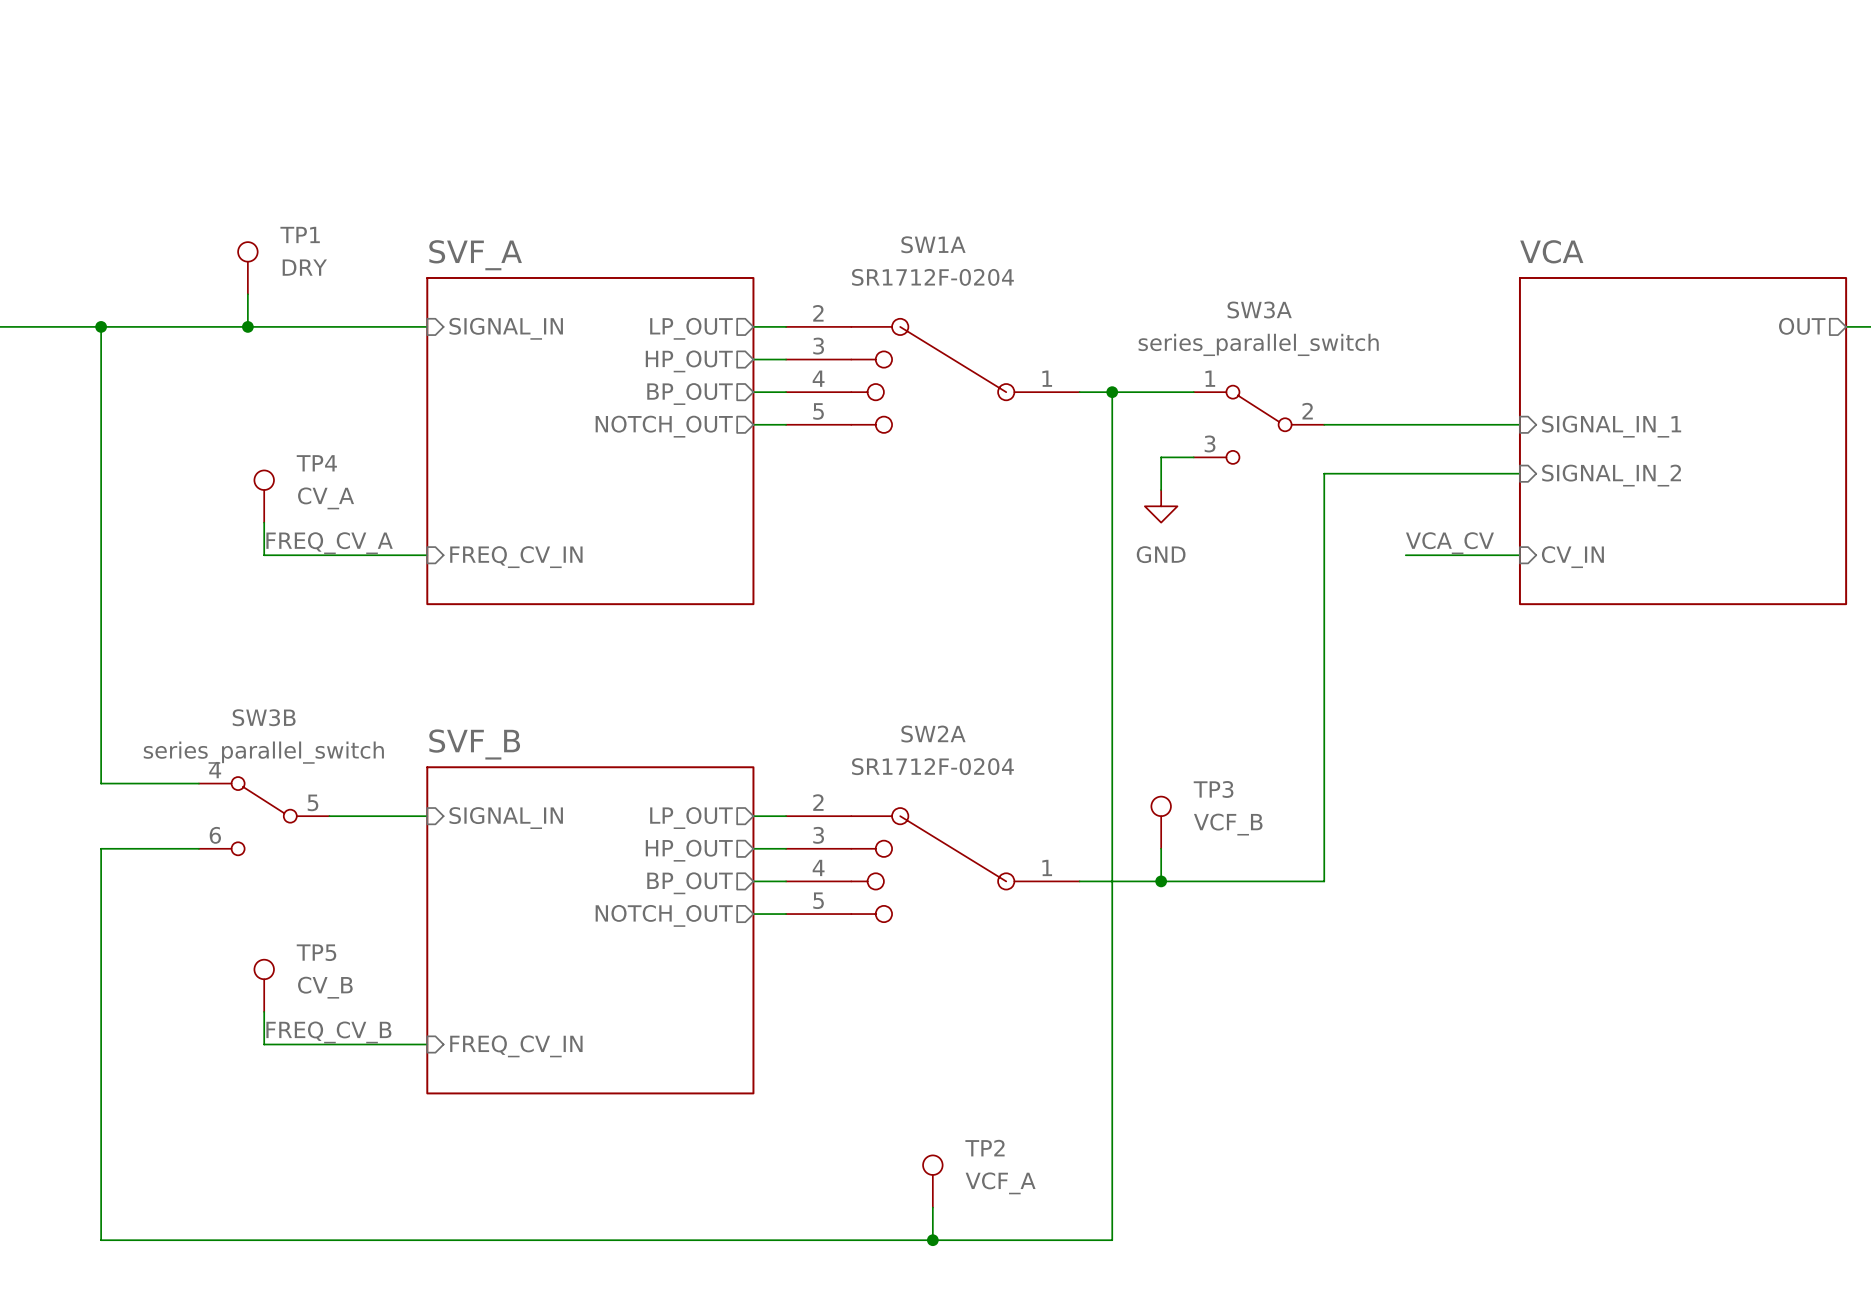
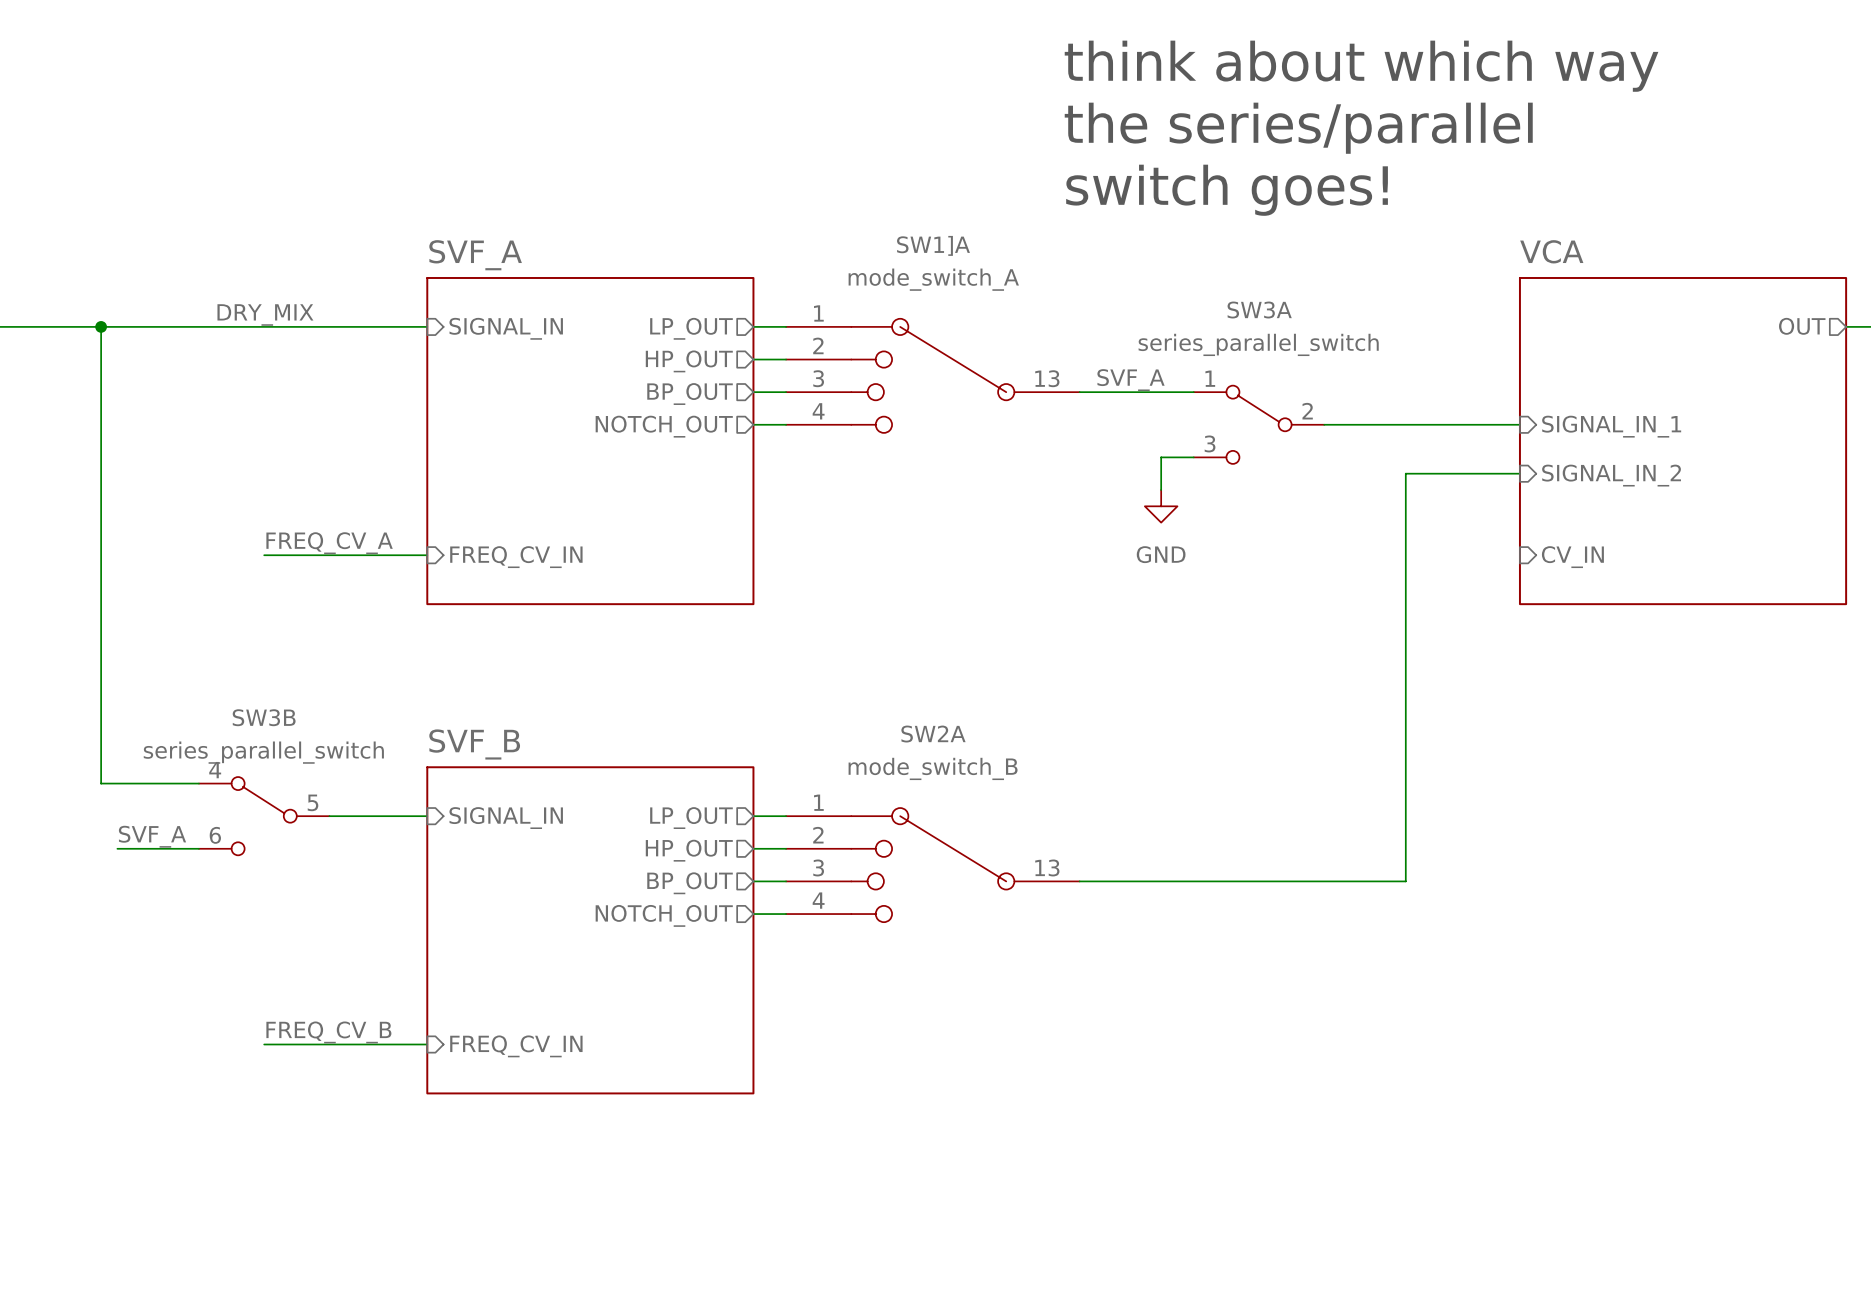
text: none -> think about which way (1361, 66)
text: none -> the series/parallel (1298, 128)
text: none -> switch goes! (1227, 190)
SW1A name: SW1A (933, 244) -> SW1]A (933, 245)
TP1: DRY (247, 268) -> none
SW1A value: SR1712F-0204 (932, 277) -> mode_switch_A (933, 279)
wire: (247, 294) (247, 326) -> none
SW1A pin number: 2 (818, 313) -> 1 (818, 313)
label: none -> DRY_MIX (265, 315)
junction: (247, 326) -> none
SW1A pin number: 3 (818, 346) -> 2 (818, 345)
SW1A pin number: 4 (818, 378) -> 3 (818, 378)
SW1A pin number: 1 (1047, 378) -> 13 (1047, 378)
label: none -> SVF_A (1131, 380)
wire: (1112, 392) (1112, 1240) (101, 1240) (101, 848) (117, 848) -> none
junction: (1112, 392) -> none
SW1A pin number: 5 (818, 411) -> 4 (818, 411)
wire: (1405, 473) (1324, 473) (1324, 881) -> (1405, 473) (1405, 881) (1324, 881)
TP4: CV_A (264, 496) -> none
wire: (264, 522) (264, 555) -> none
label: VCA_CV (1449, 543) -> none
wire: (1405, 555) (1519, 555) -> none
SW2A value: SR1712F-0204 (932, 766) -> mode_switch_B (933, 768)
SW2A pin number: 2 (818, 802) -> 1 (818, 802)
TP3: VCF_B (1161, 822) -> none
SW2A pin number: 3 (818, 835) -> 2 (818, 835)
label: none -> SVF_A (152, 836)
wire: (1161, 848) (1161, 881) -> none
SW2A pin number: 4 (818, 867) -> 3 (818, 867)
SW2A pin number: 1 (1047, 867) -> 13 (1047, 867)
junction: (1161, 881) -> none
SW2A pin number: 5 (818, 900) -> 4 (818, 900)
TP5: CV_B (264, 985) -> none
wire: (264, 1011) (264, 1044) -> none
TP2: VCF_A (932, 1181) -> none
wire: (932, 1207) (932, 1240) -> none
junction: (932, 1240) -> none

